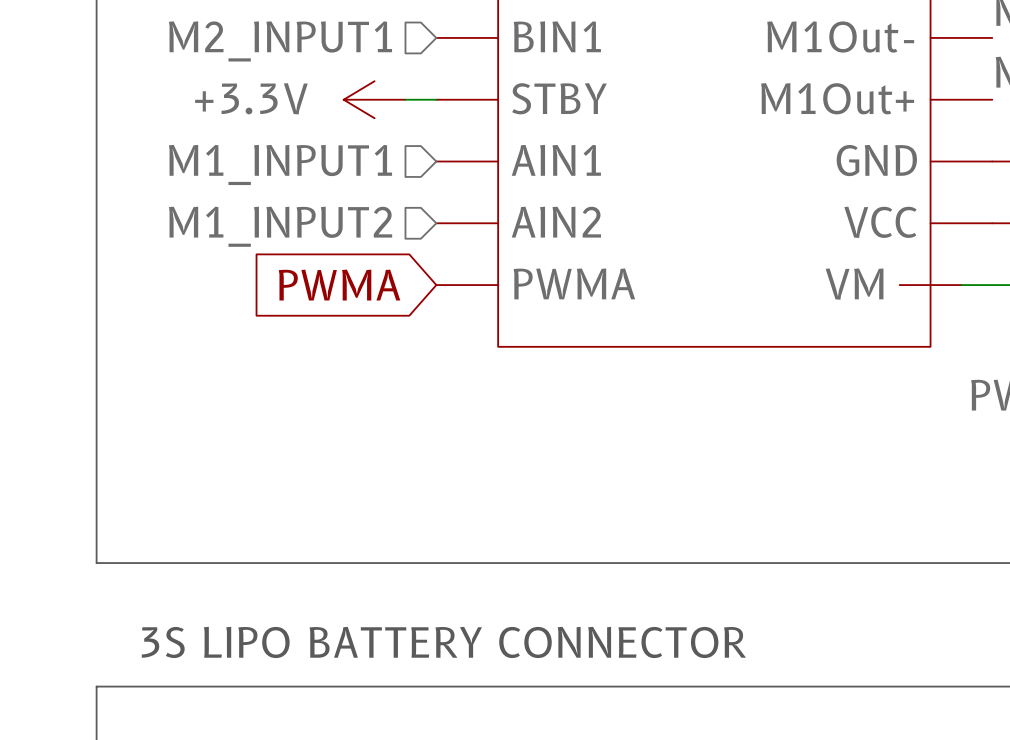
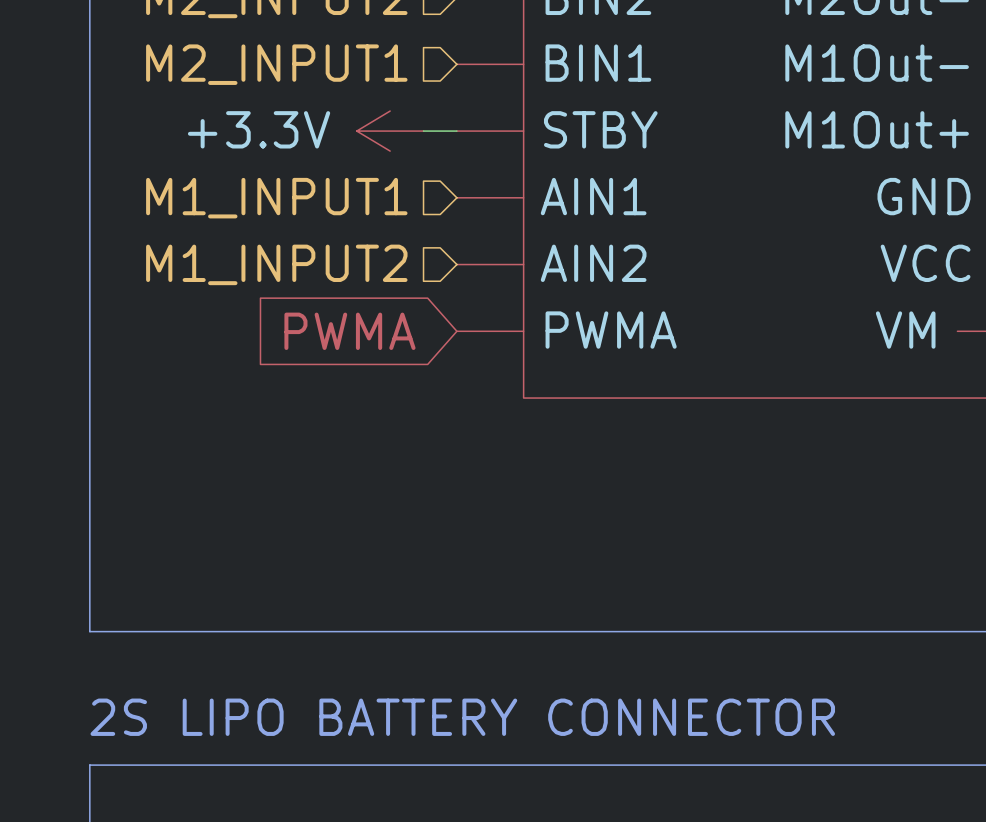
text: 3S LIPO BATTERY CONNECTOR (443, 642) -> 2S LIPO BATTERY CONNECTOR (462, 717)

